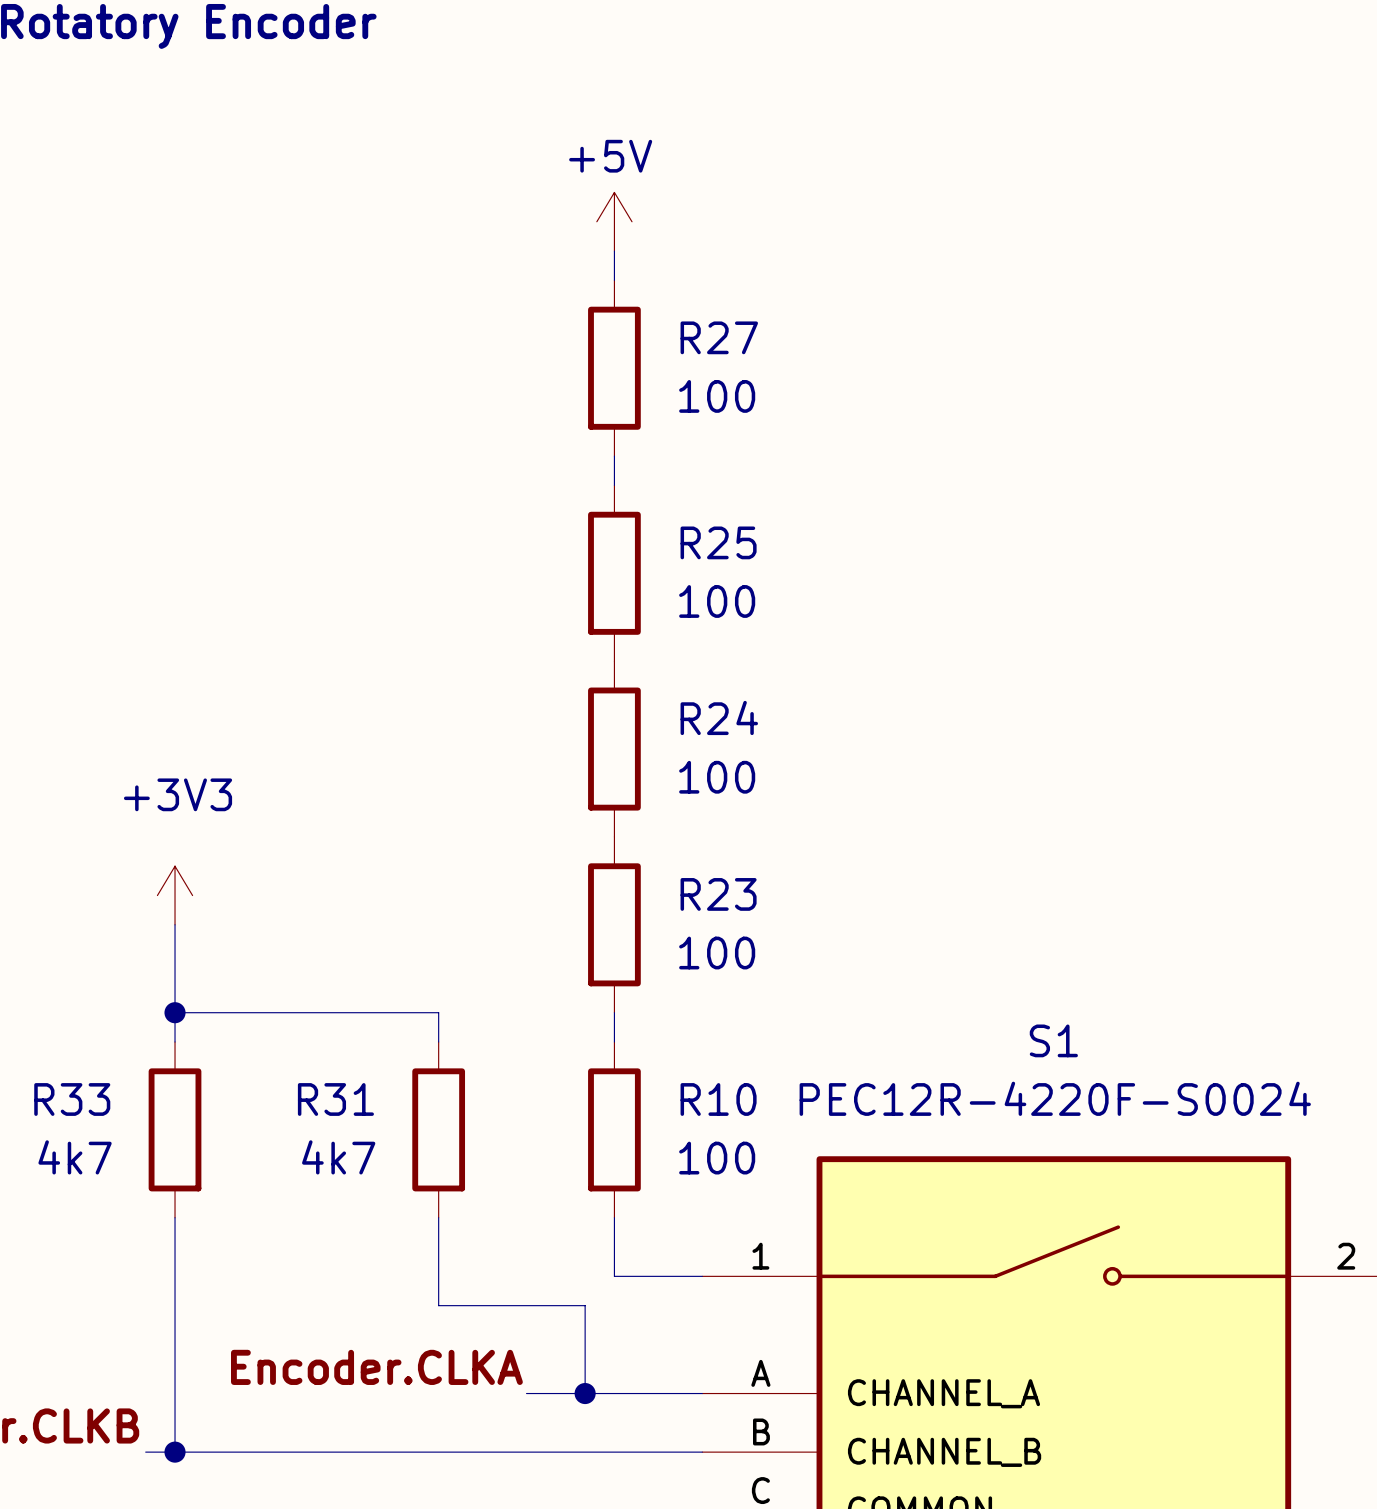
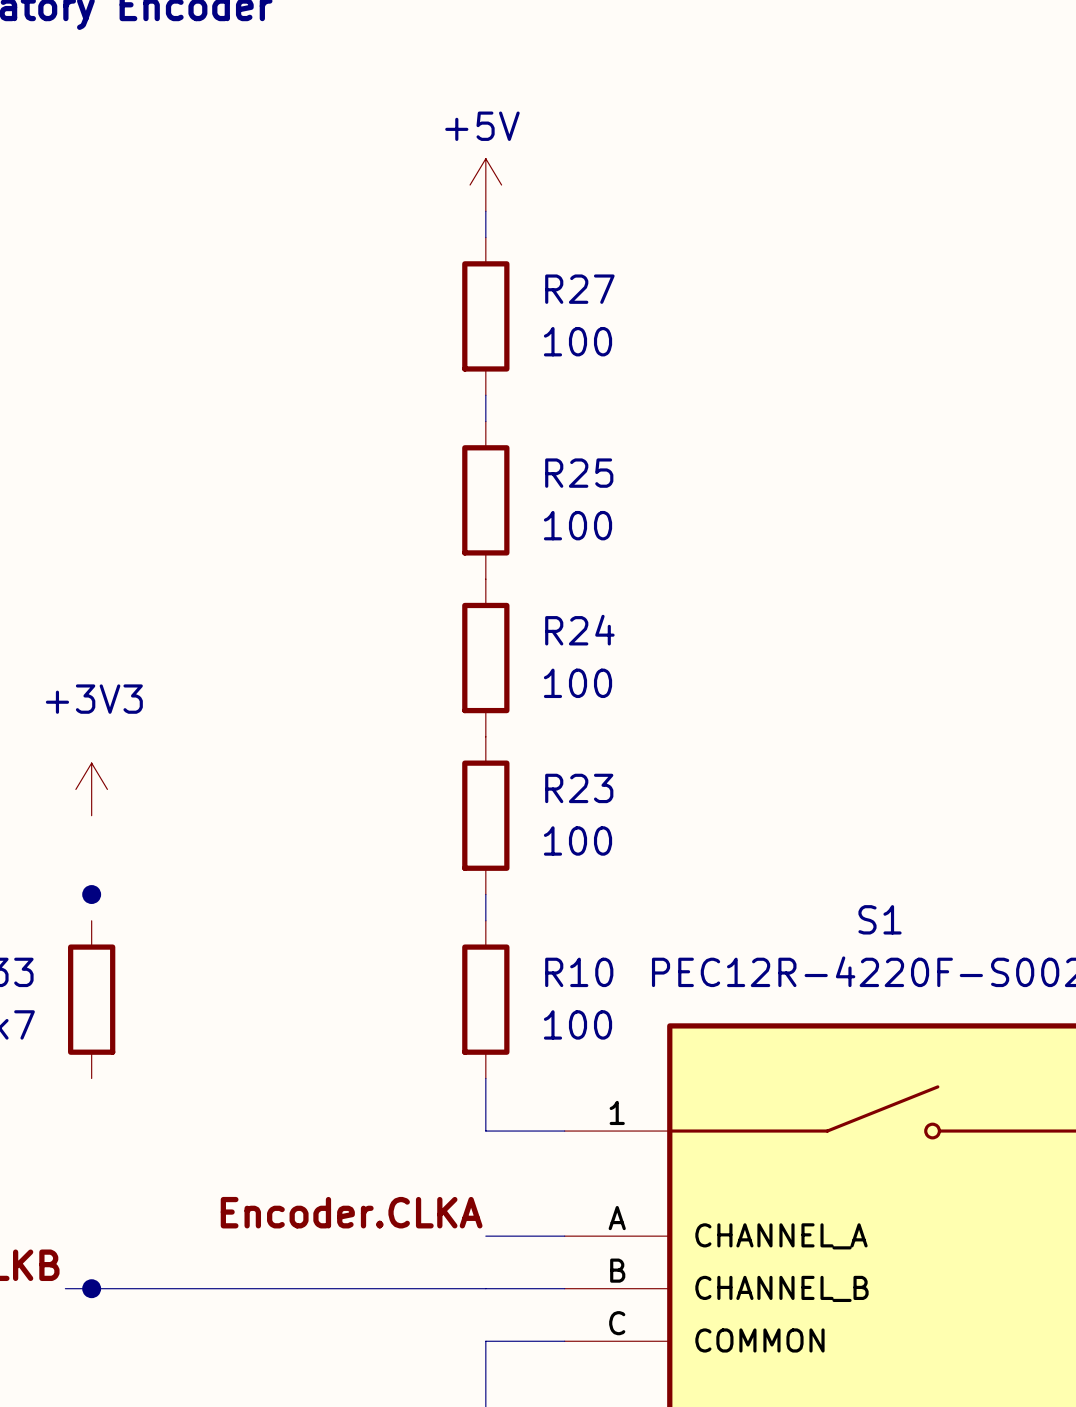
wire: (175, 924) (175, 1042) -> none
wire: (175, 1012) (438, 1012) (438, 1042) -> none
R31: 4k7 (438, 1129) -> none
wire: (175, 1217) (175, 1452) -> none
wire: (438, 1217) (438, 1305) (585, 1305) (585, 1393) -> none
label position: Encoder.CLKA (376, 1367) -> Encoder.CLKA (351, 1212)
wire: (526, 1393) (614, 1393) -> none
junction: (585, 1393) -> none

